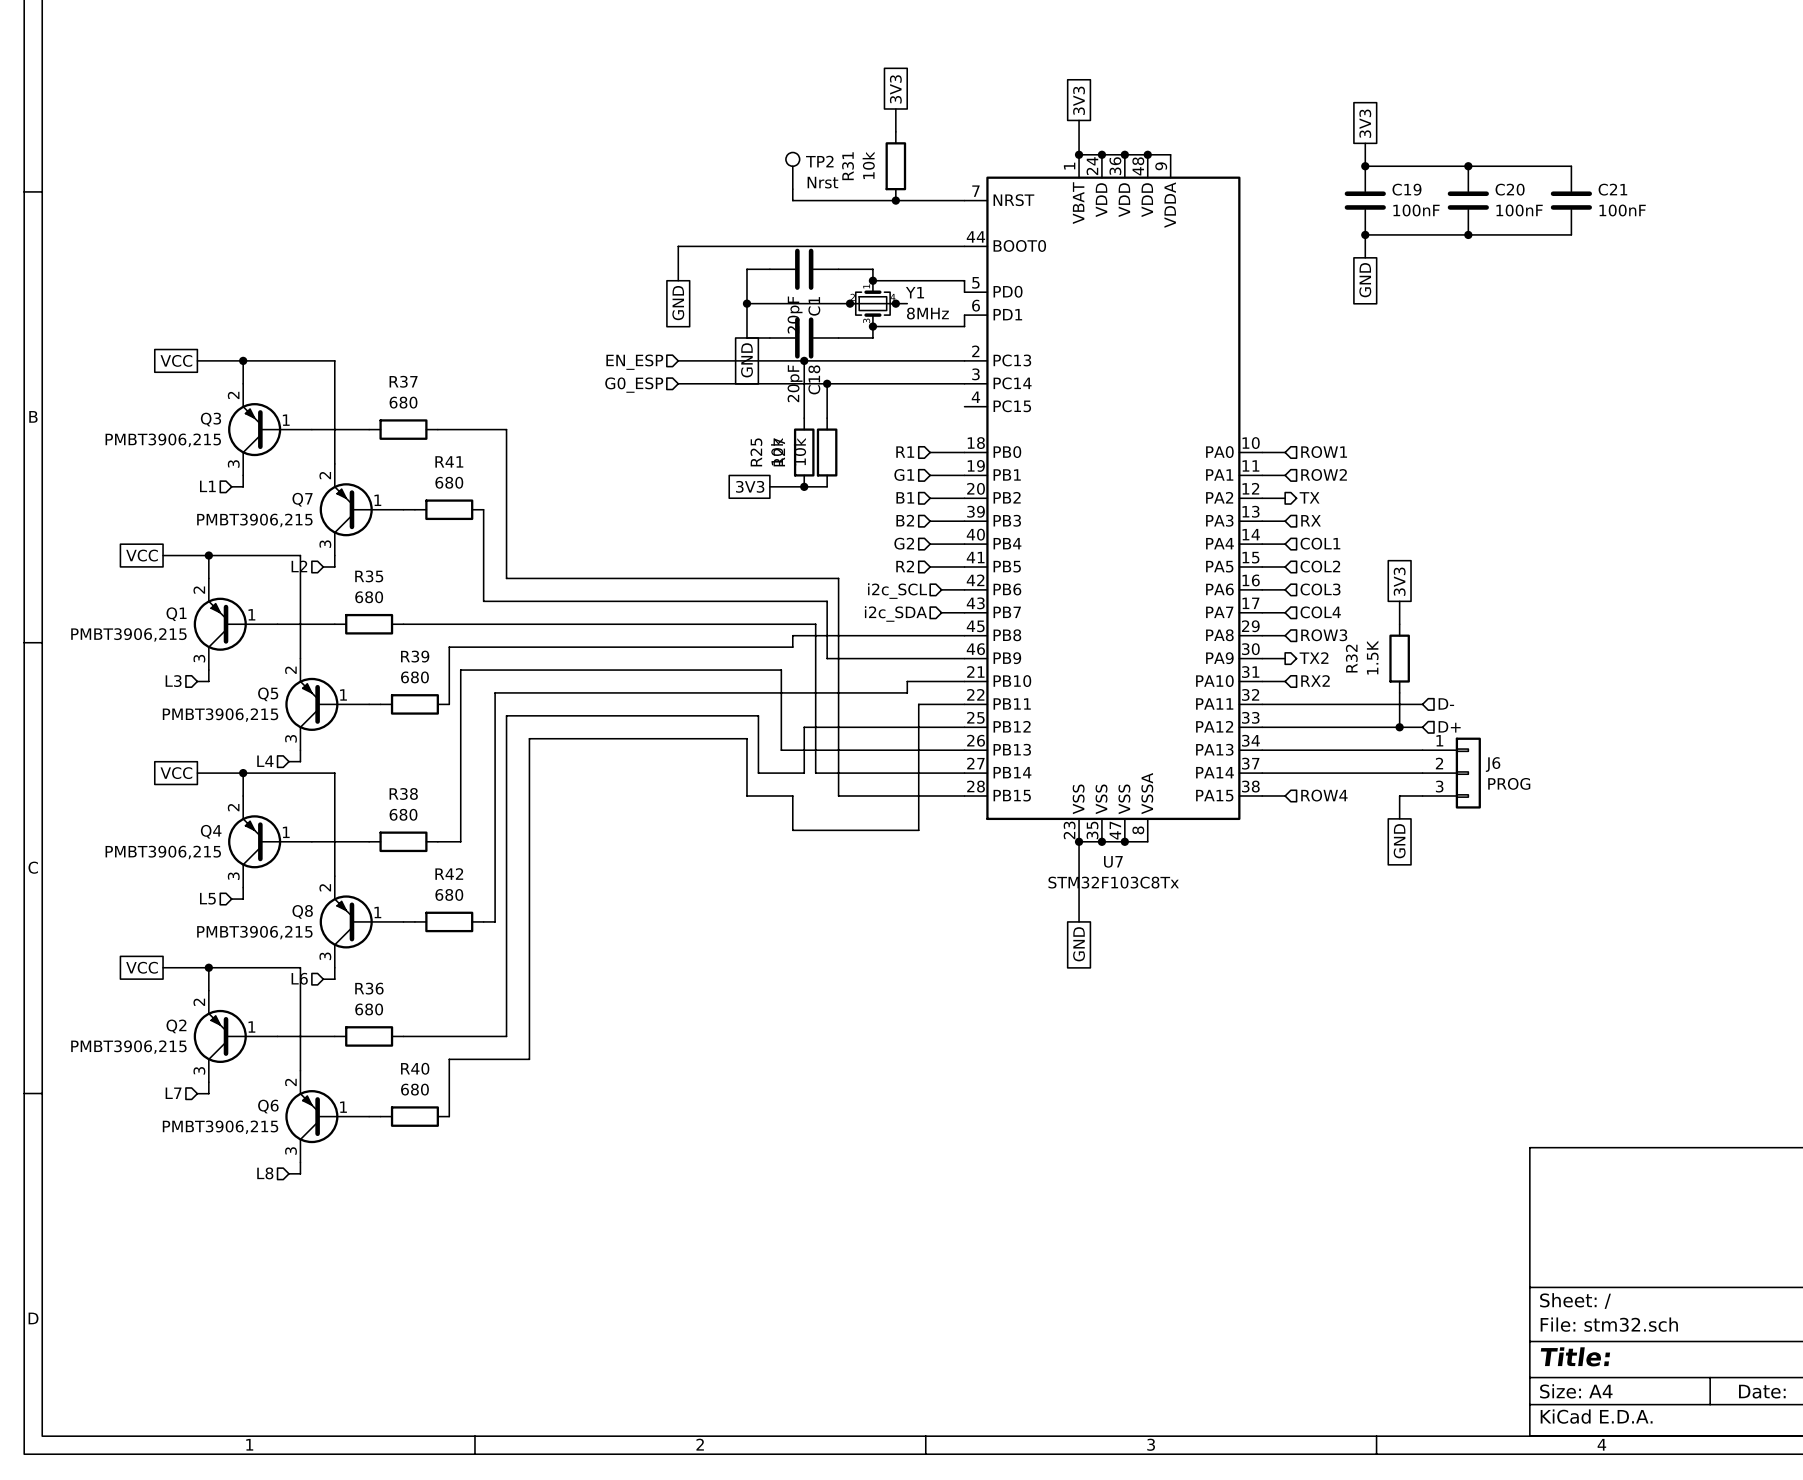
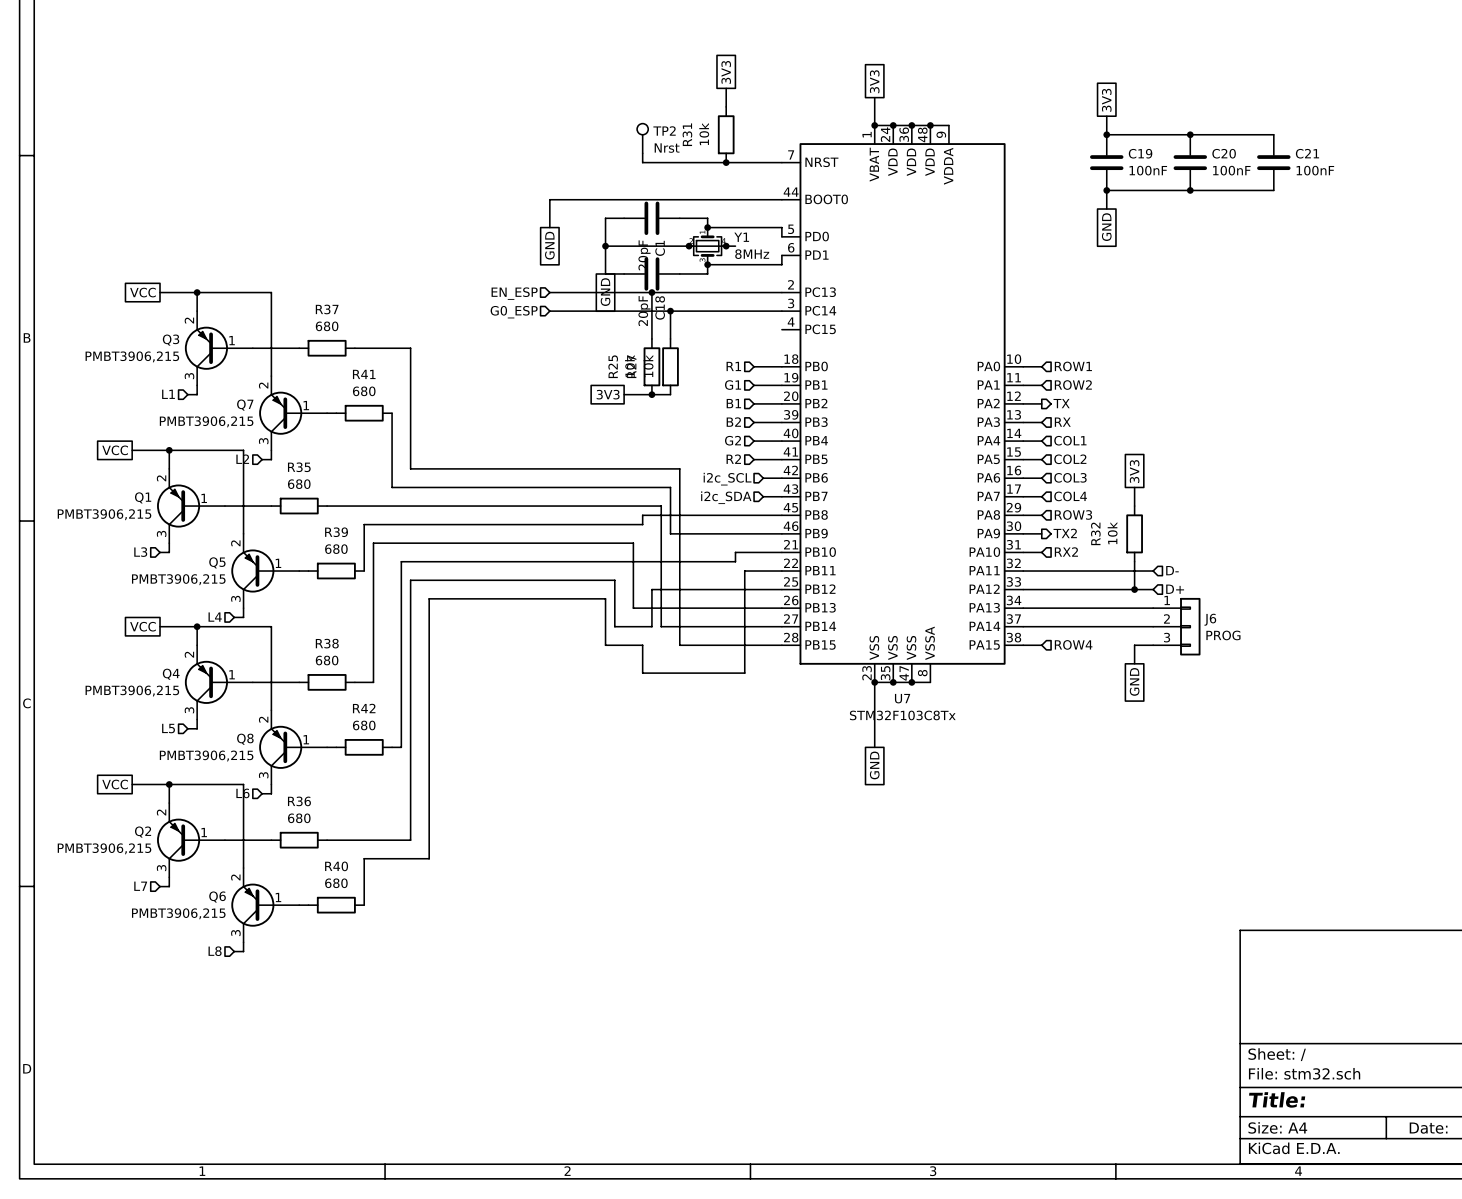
R32 value: 1.5K (1372, 657) -> 10k (1112, 533)

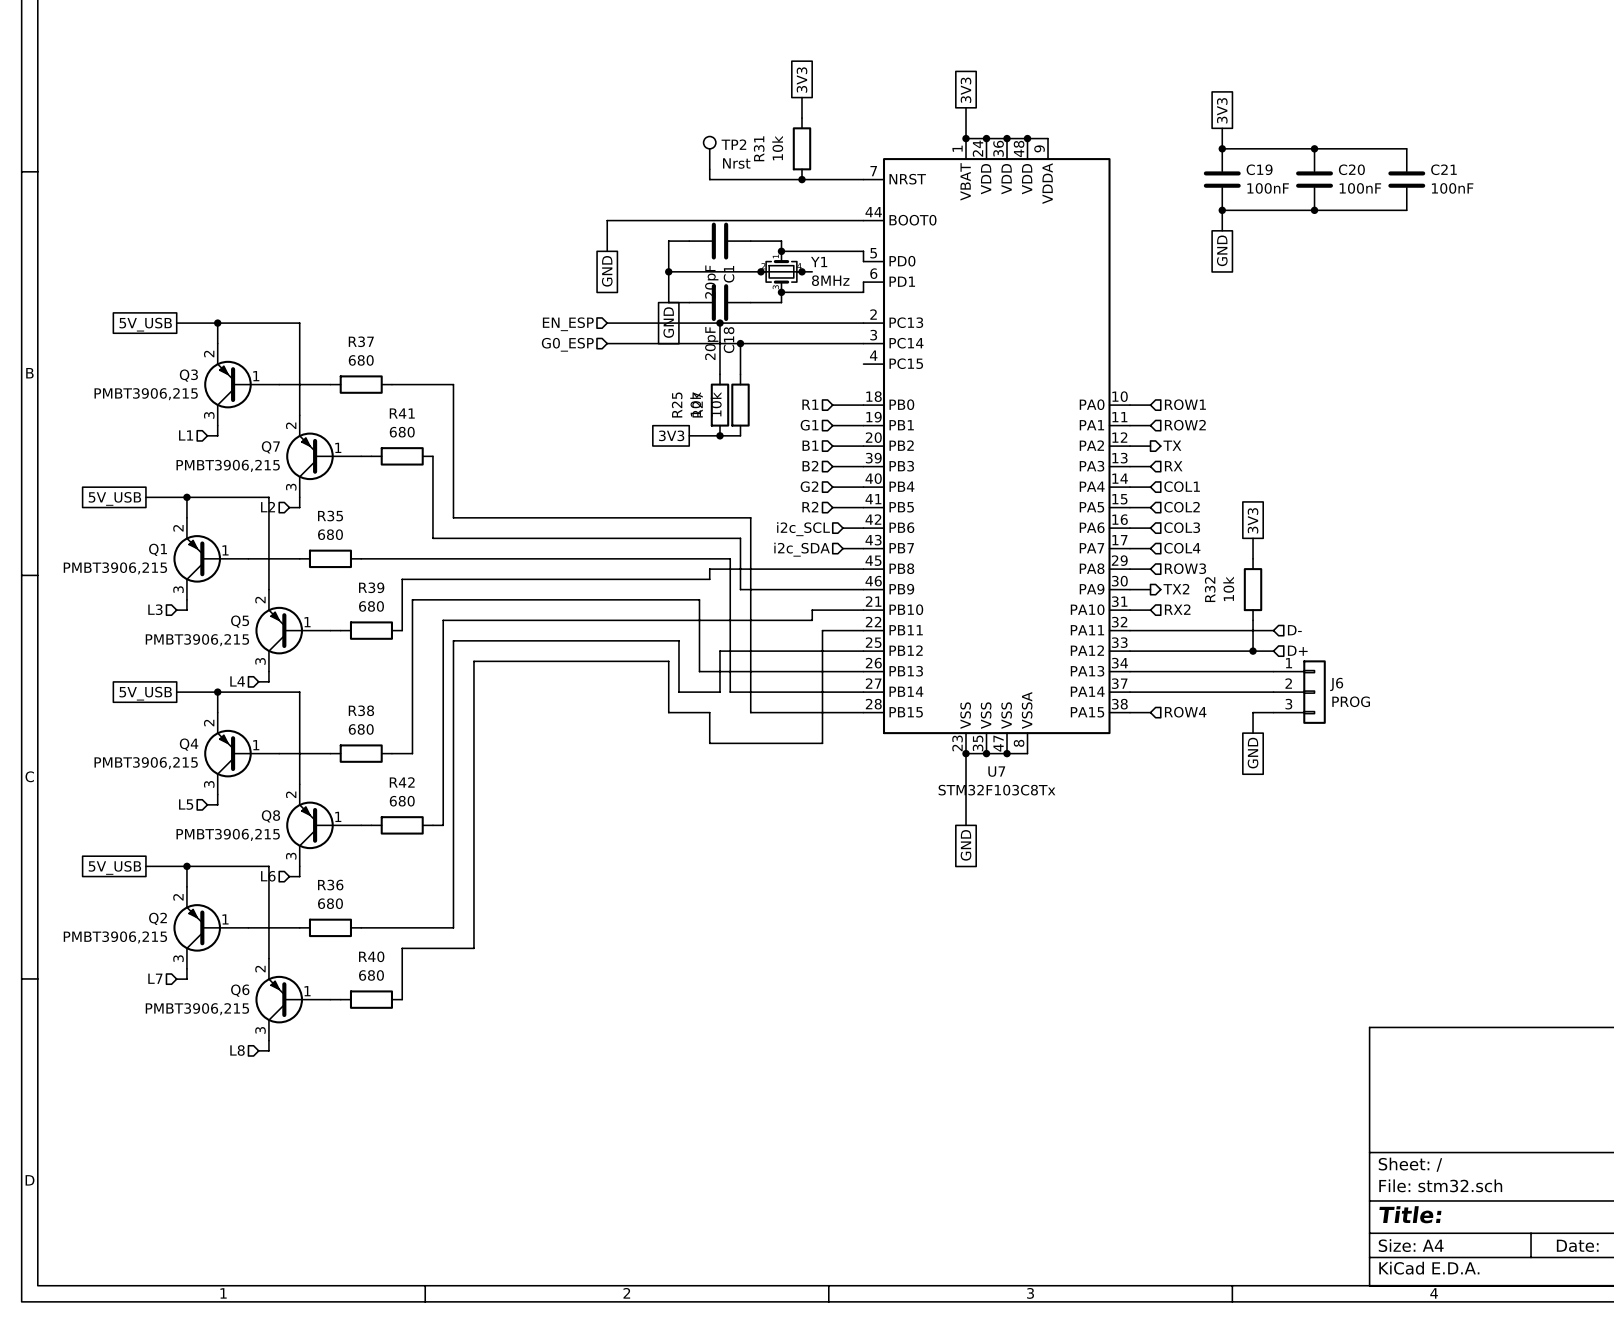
global label: VCC (142, 292) -> 5V_USB (145, 324)
global label: VCC (115, 450) -> 5V_USB (114, 498)
global label: VCC (142, 626) -> 5V_USB (145, 693)
global label: VCC (115, 784) -> 5V_USB (114, 867)

